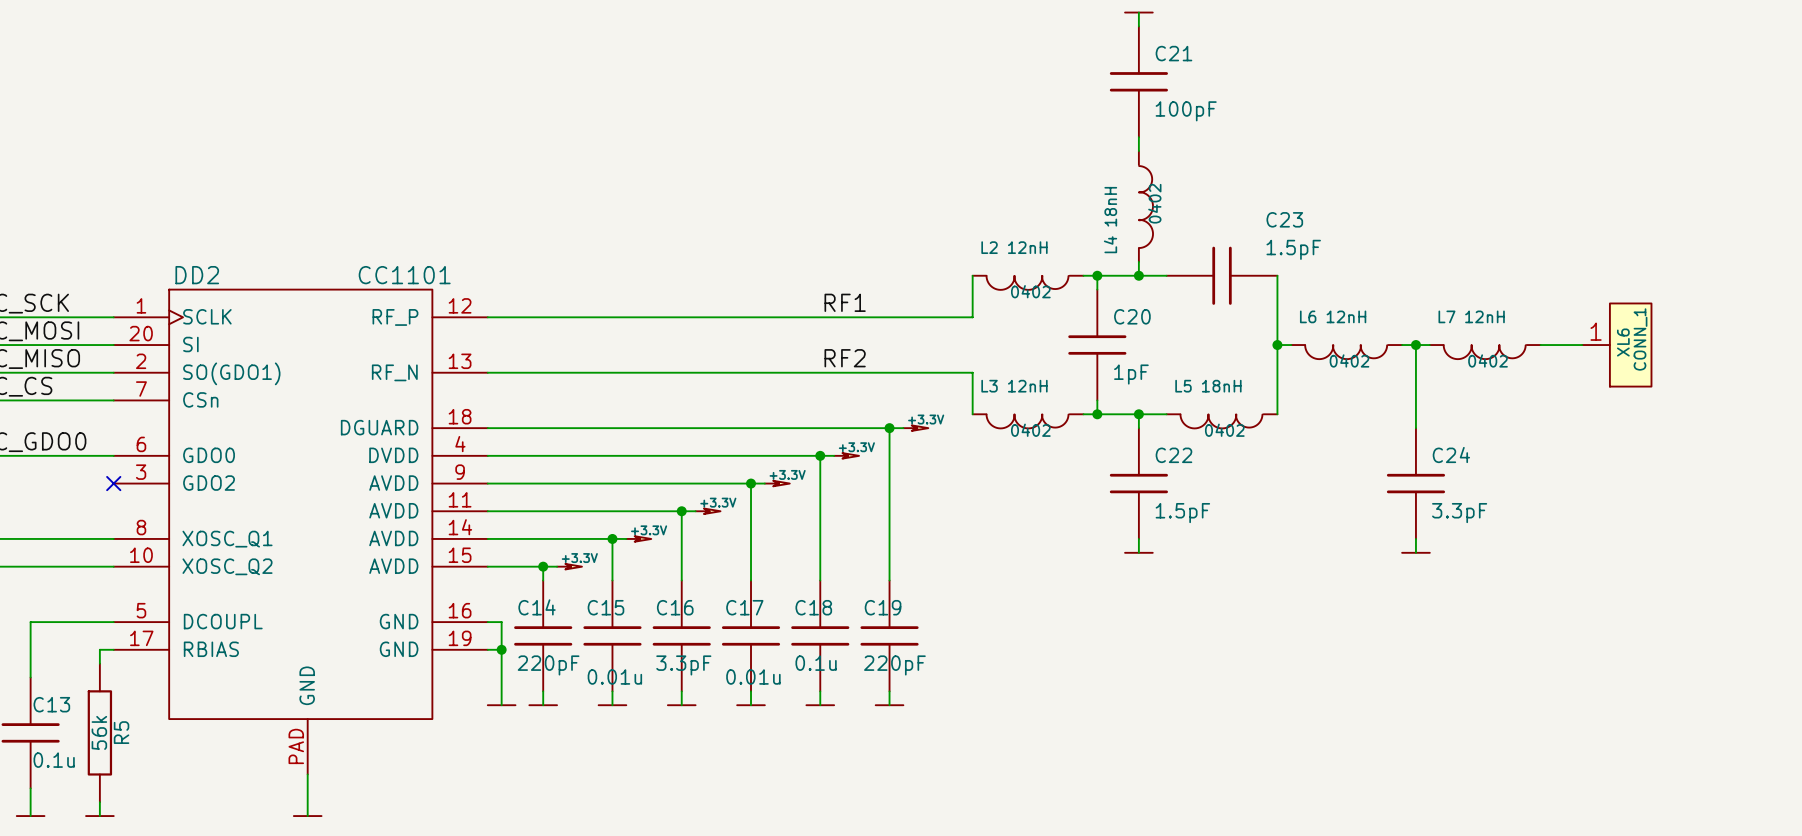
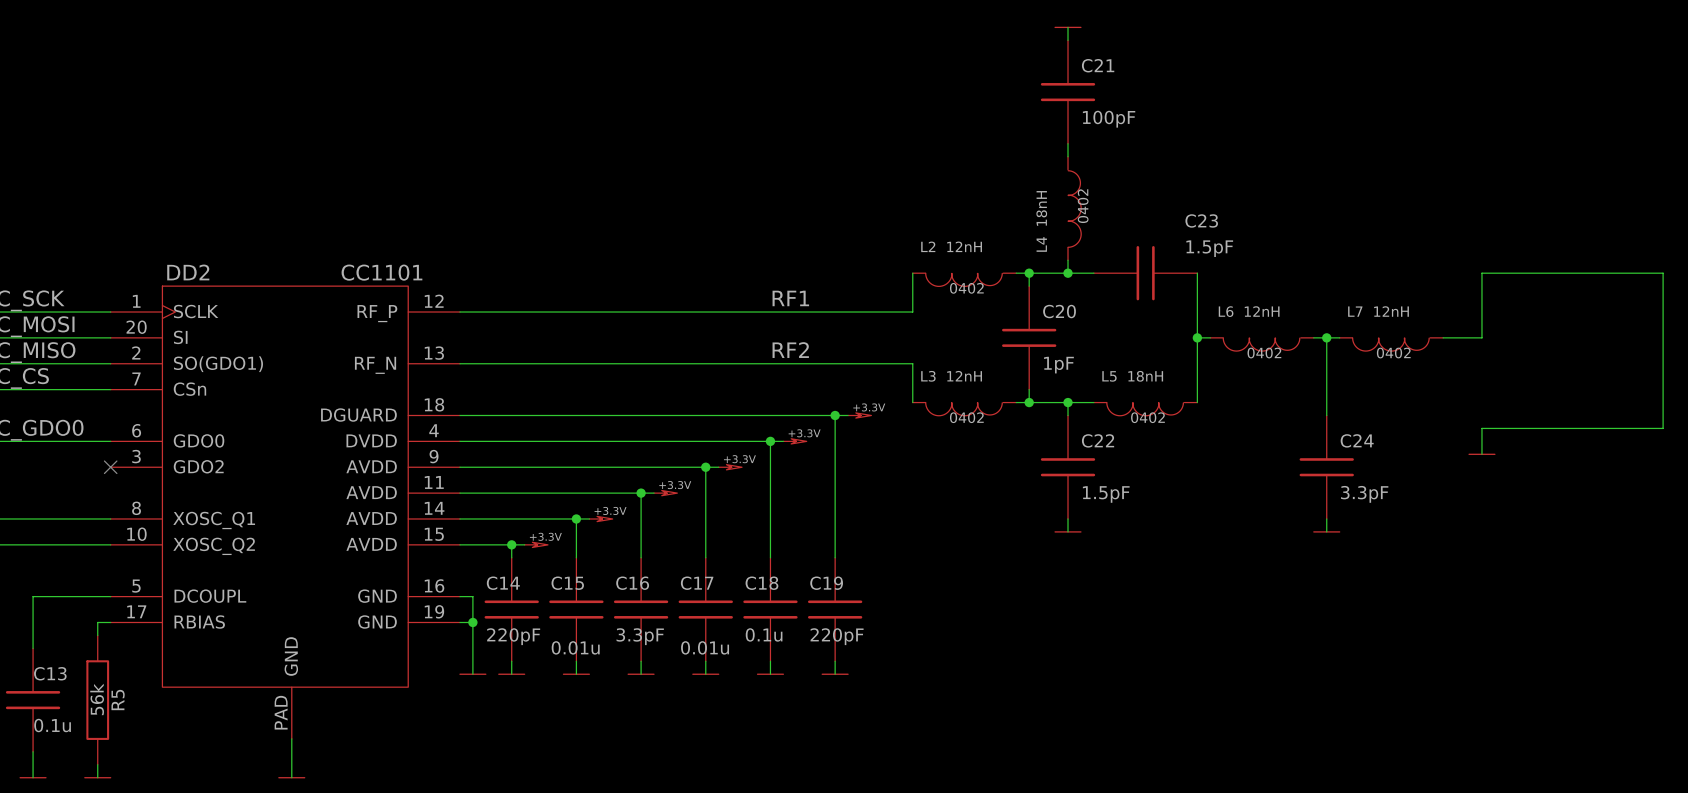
wire: none -> (1481, 337) (1481, 273) (1663, 273) (1663, 428) (1481, 428) (1481, 454)
XL6: CONN_1 (1616, 345) -> none
power symbol: none -> (1481, 454)

